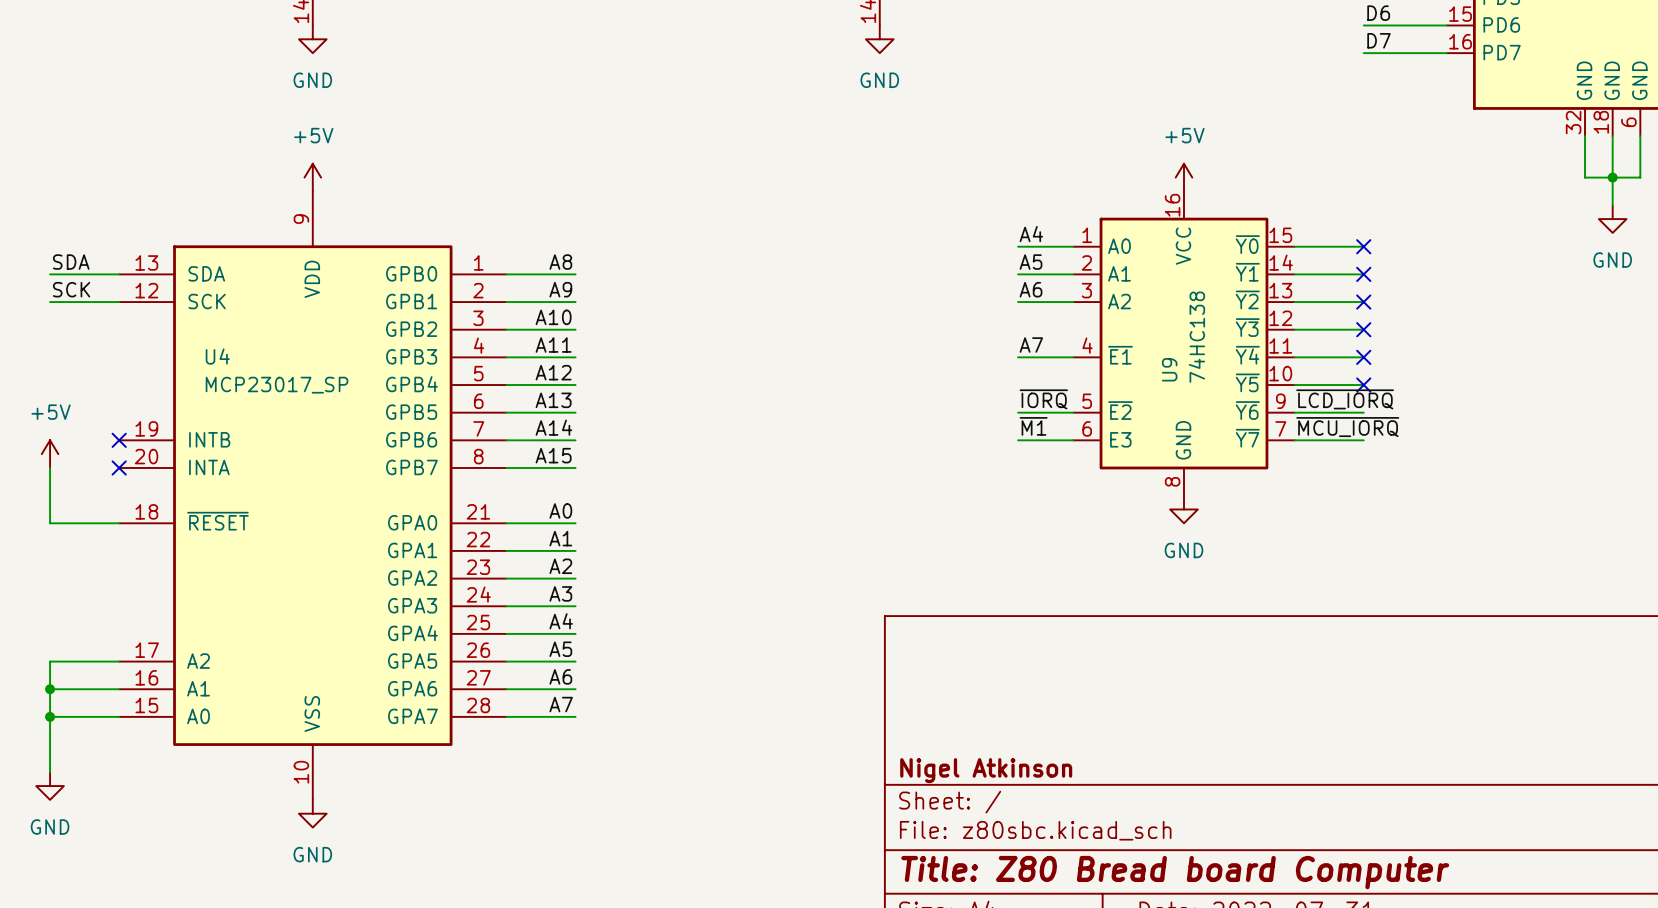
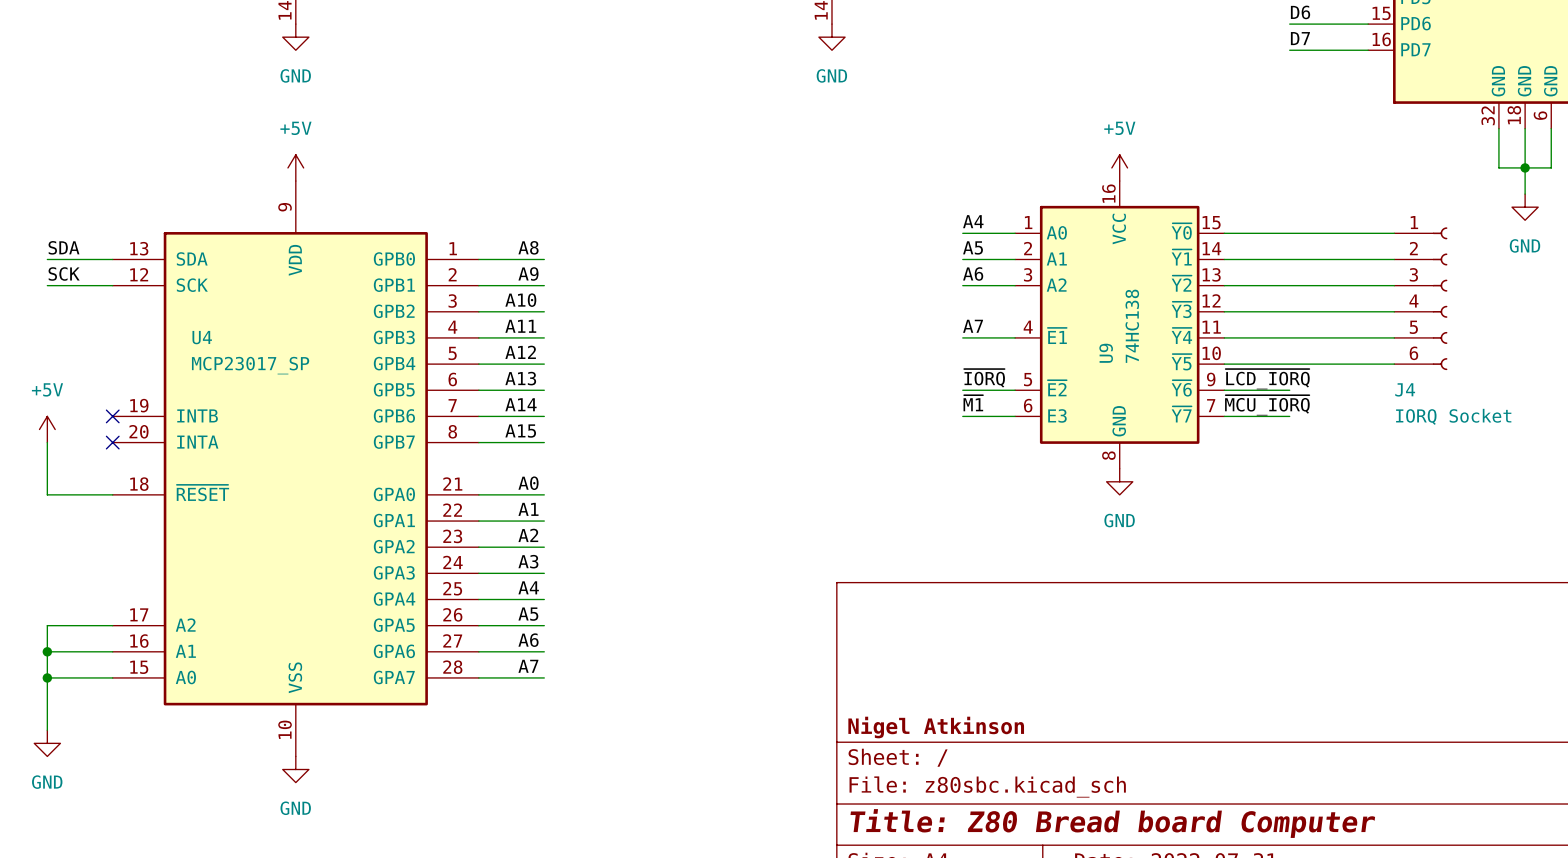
wire: none -> (1289, 233) (1394, 233)
no-connect mark: (1363, 246) -> none
wire: none -> (1289, 259) (1394, 259)
no-connect mark: (1363, 274) -> none
wire: none -> (1289, 285) (1394, 285)
no-connect mark: (1363, 302) -> none
J4: none -> IORQ Socket (1420, 298)
wire: none -> (1289, 311) (1394, 311)
no-connect mark: (1363, 329) -> none
wire: none -> (1289, 337) (1394, 337)
no-connect mark: (1363, 357) -> none
wire: none -> (1289, 364) (1394, 364)
no-connect mark: (1363, 385) -> none

